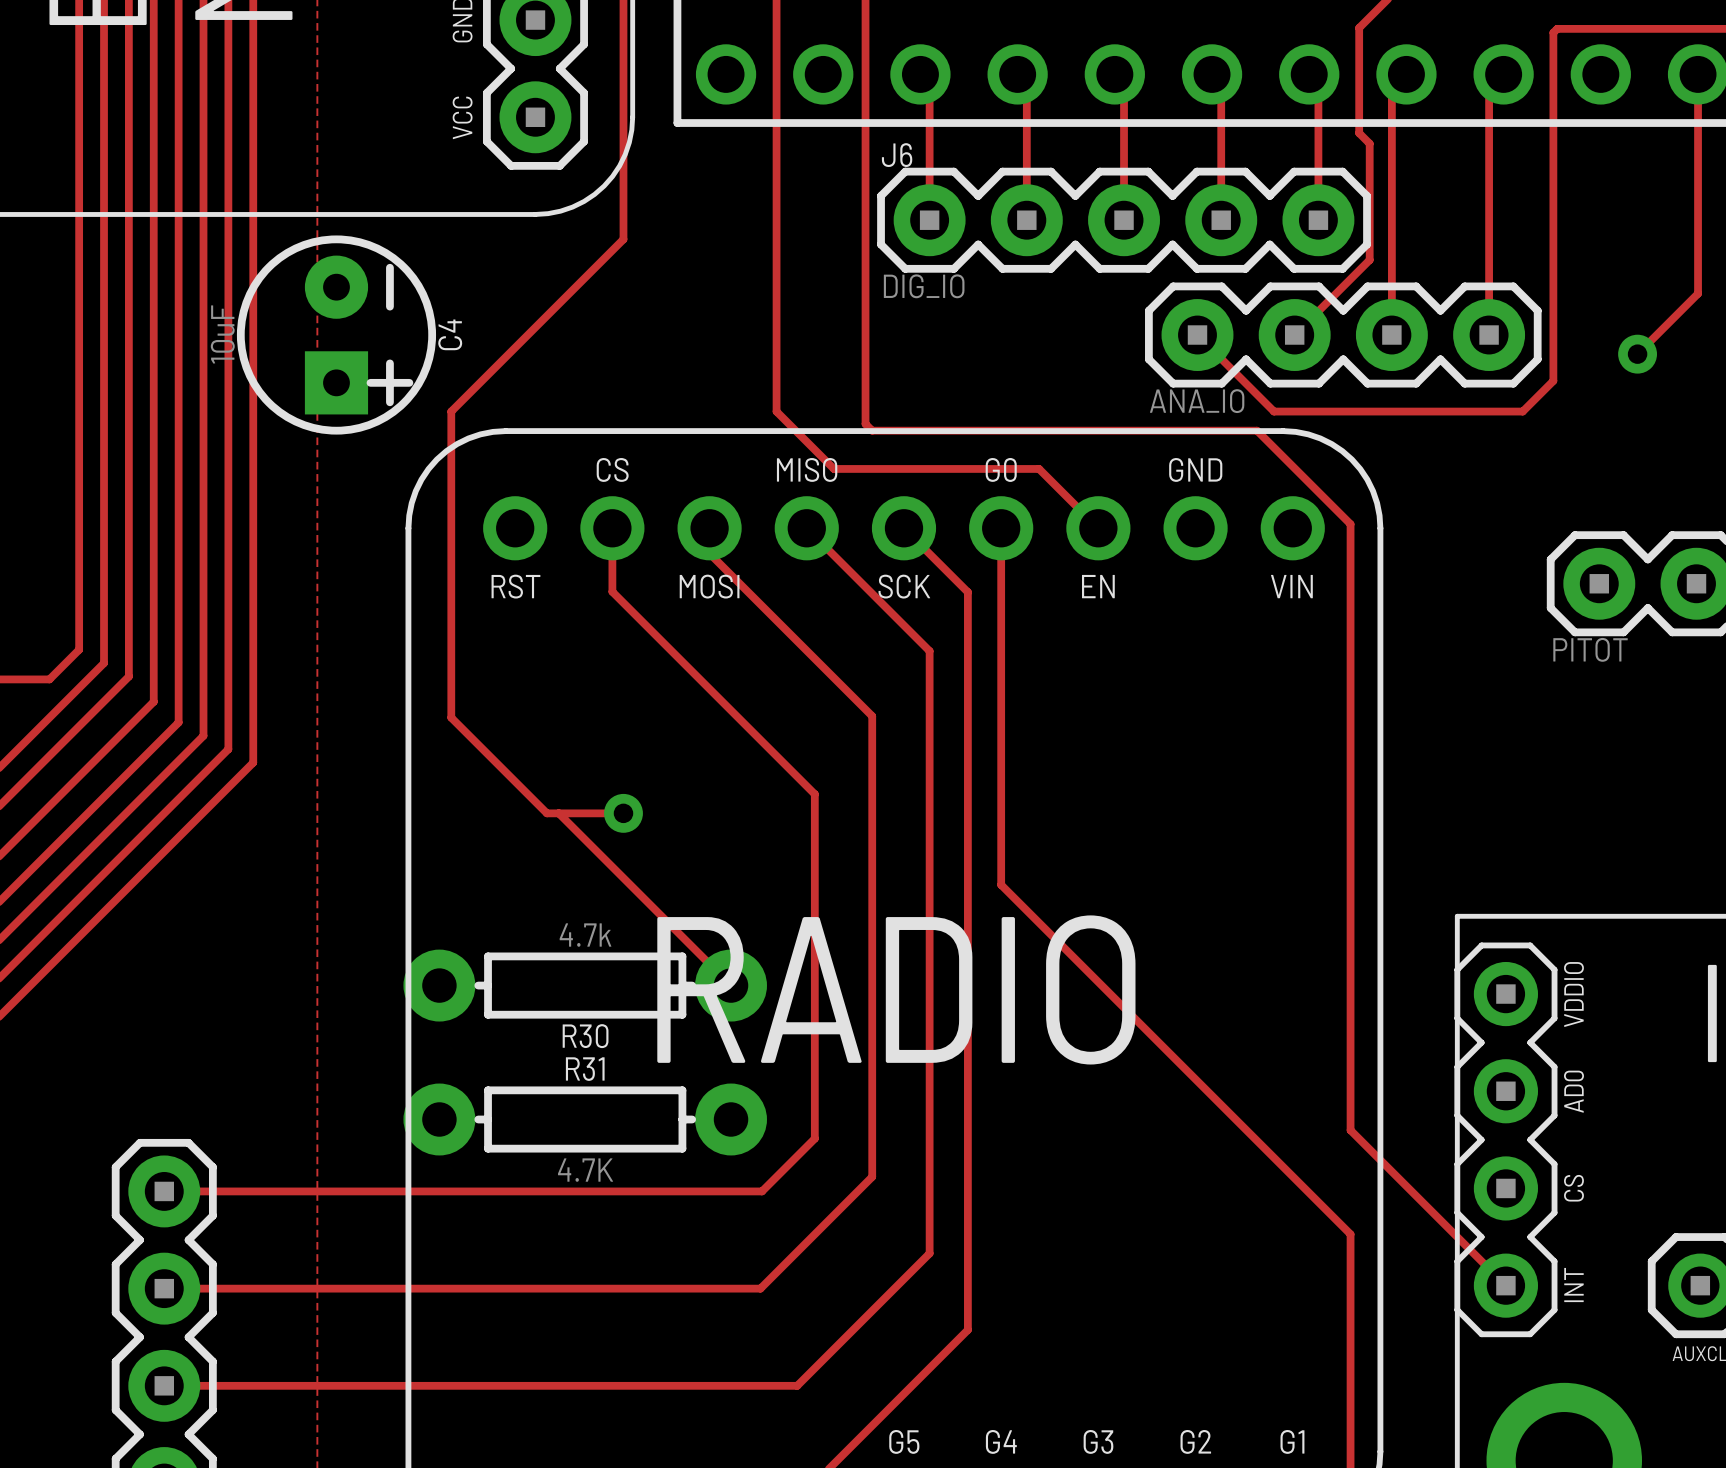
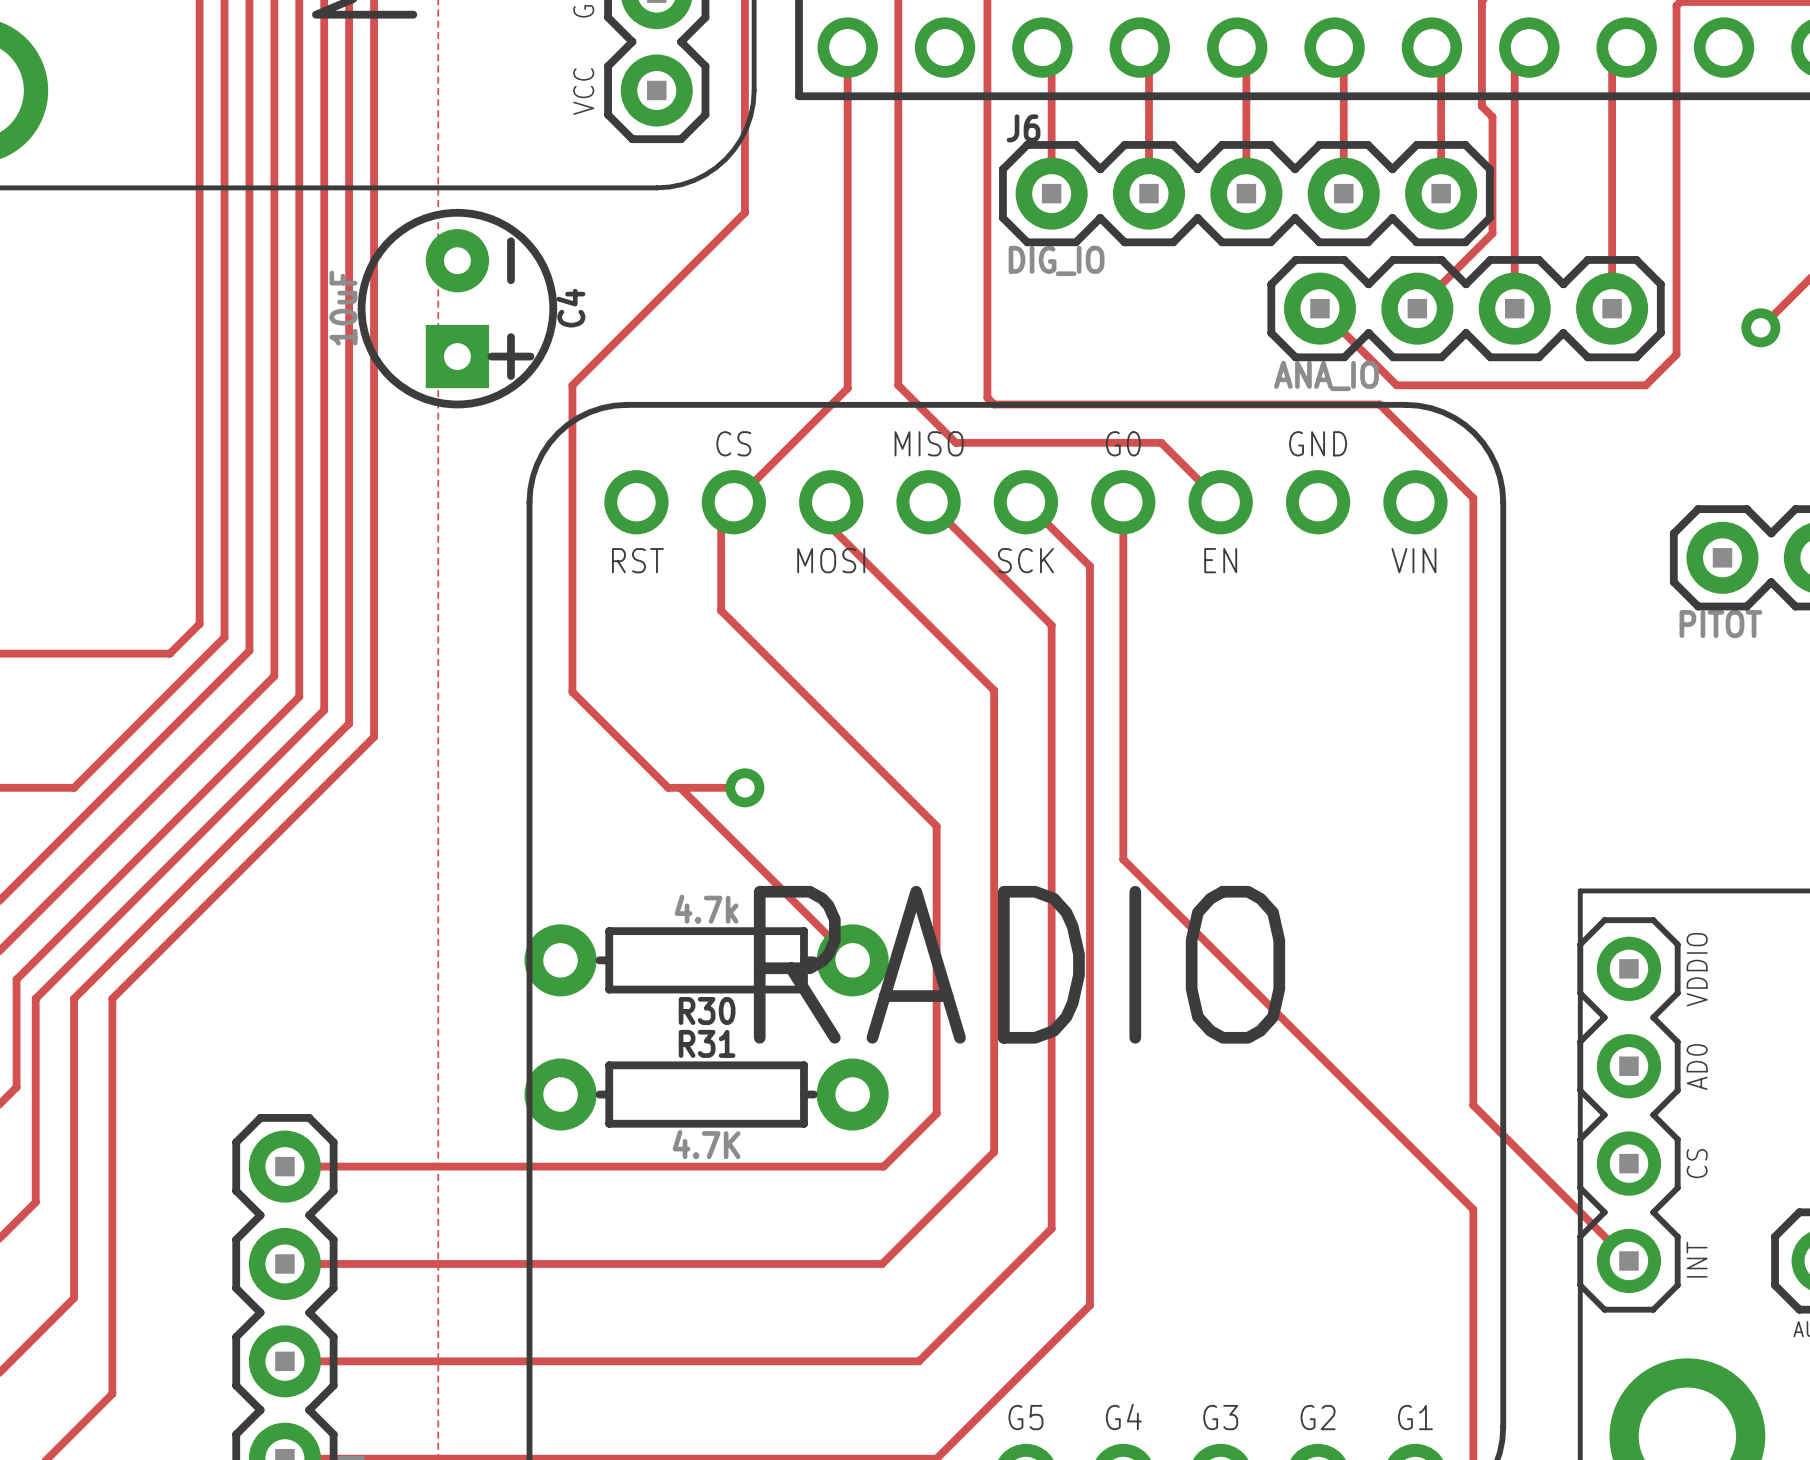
track: (612, 528) (612, 591) (814, 794) (814, 851) -> (847, 47) (847, 388) (721, 514) (721, 610) (936, 826)

